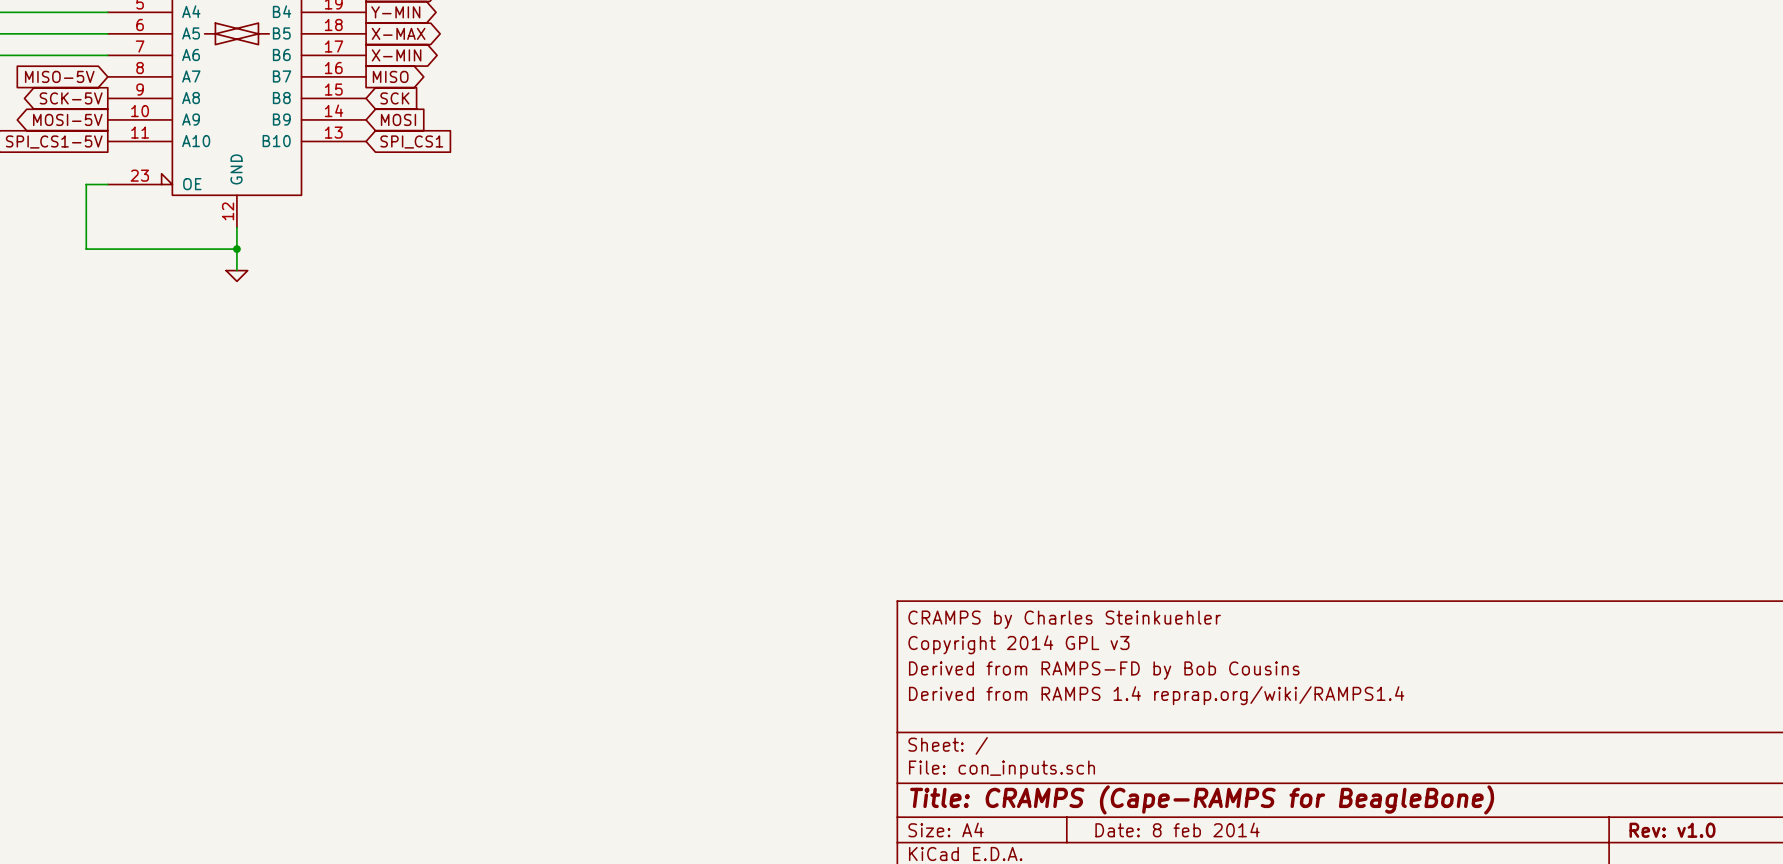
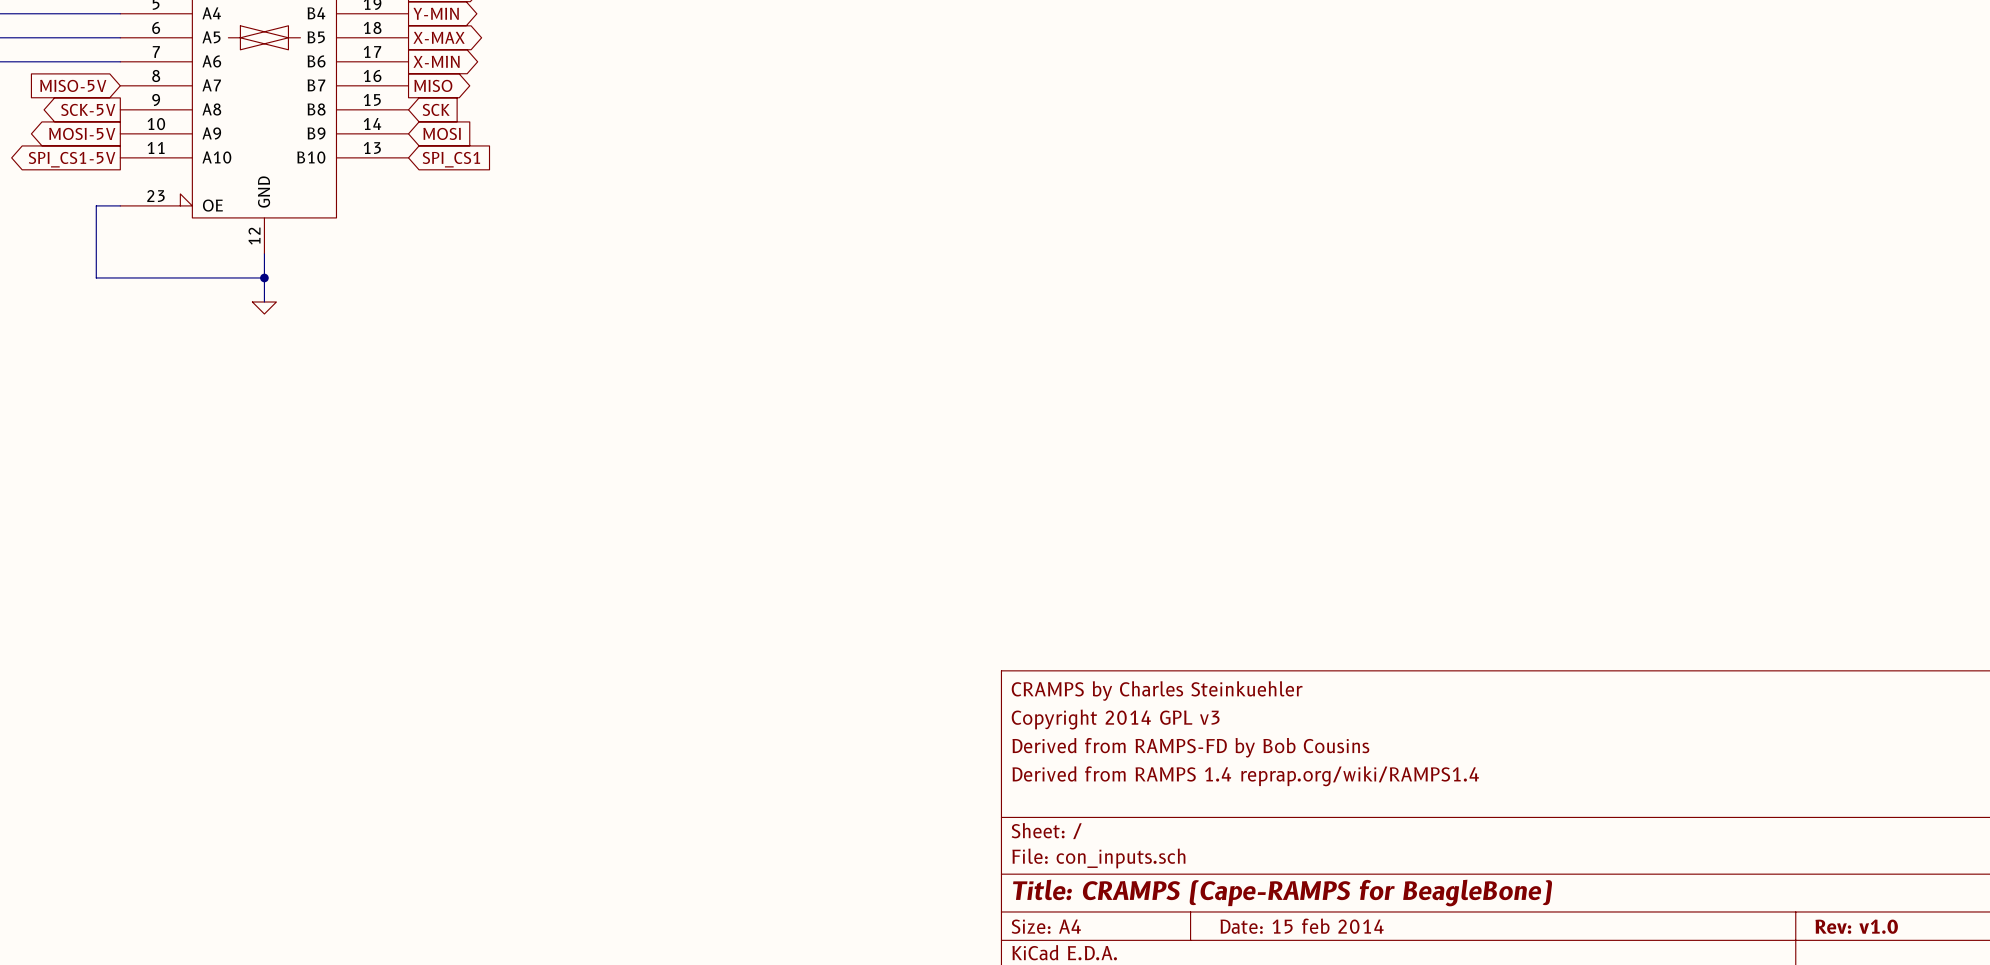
title block: Date: 8 feb 2014 (1177, 829) -> Date: 15 feb 2014 (1302, 926)

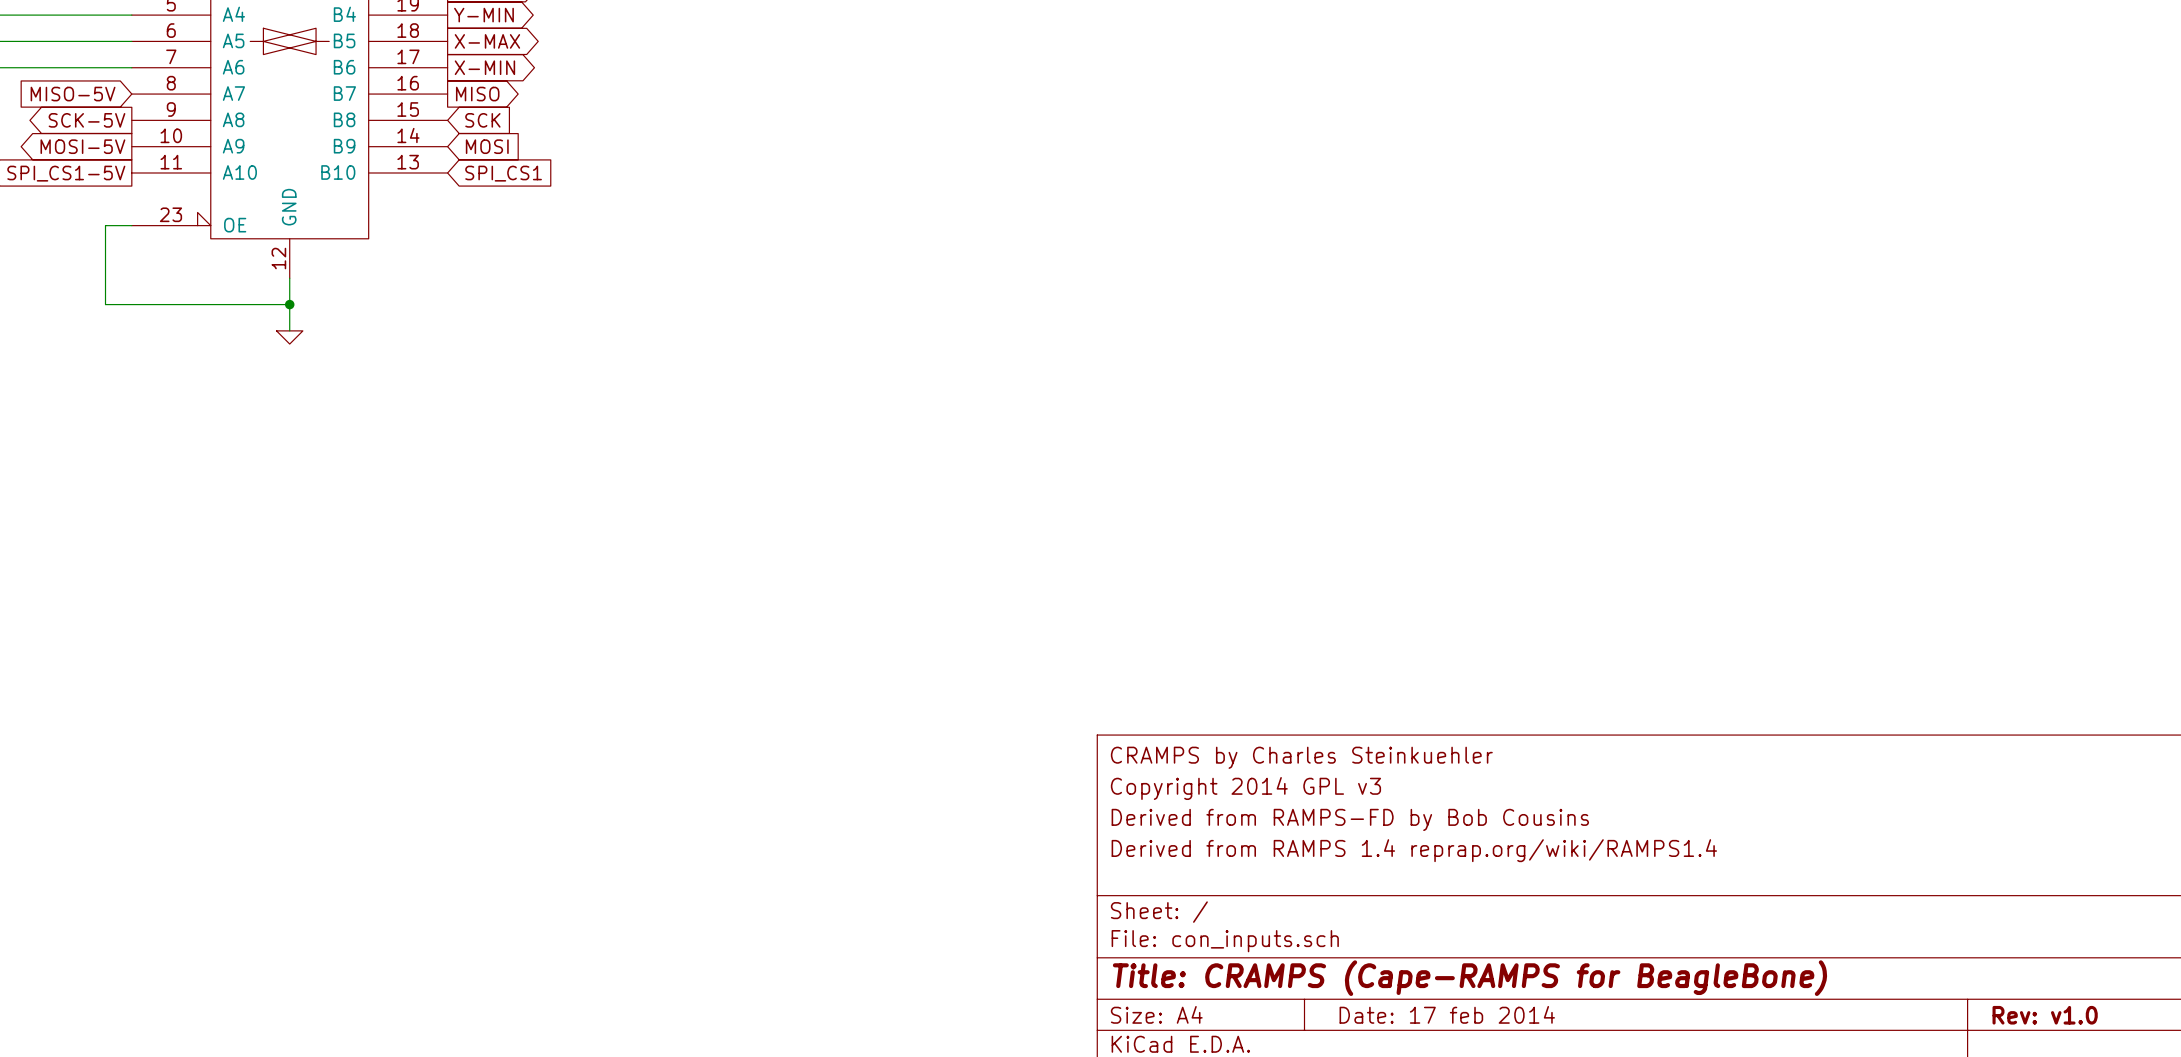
title block: Date: 15 feb 2014 (1302, 926) -> Date: 17 feb 2014 (1447, 1014)

